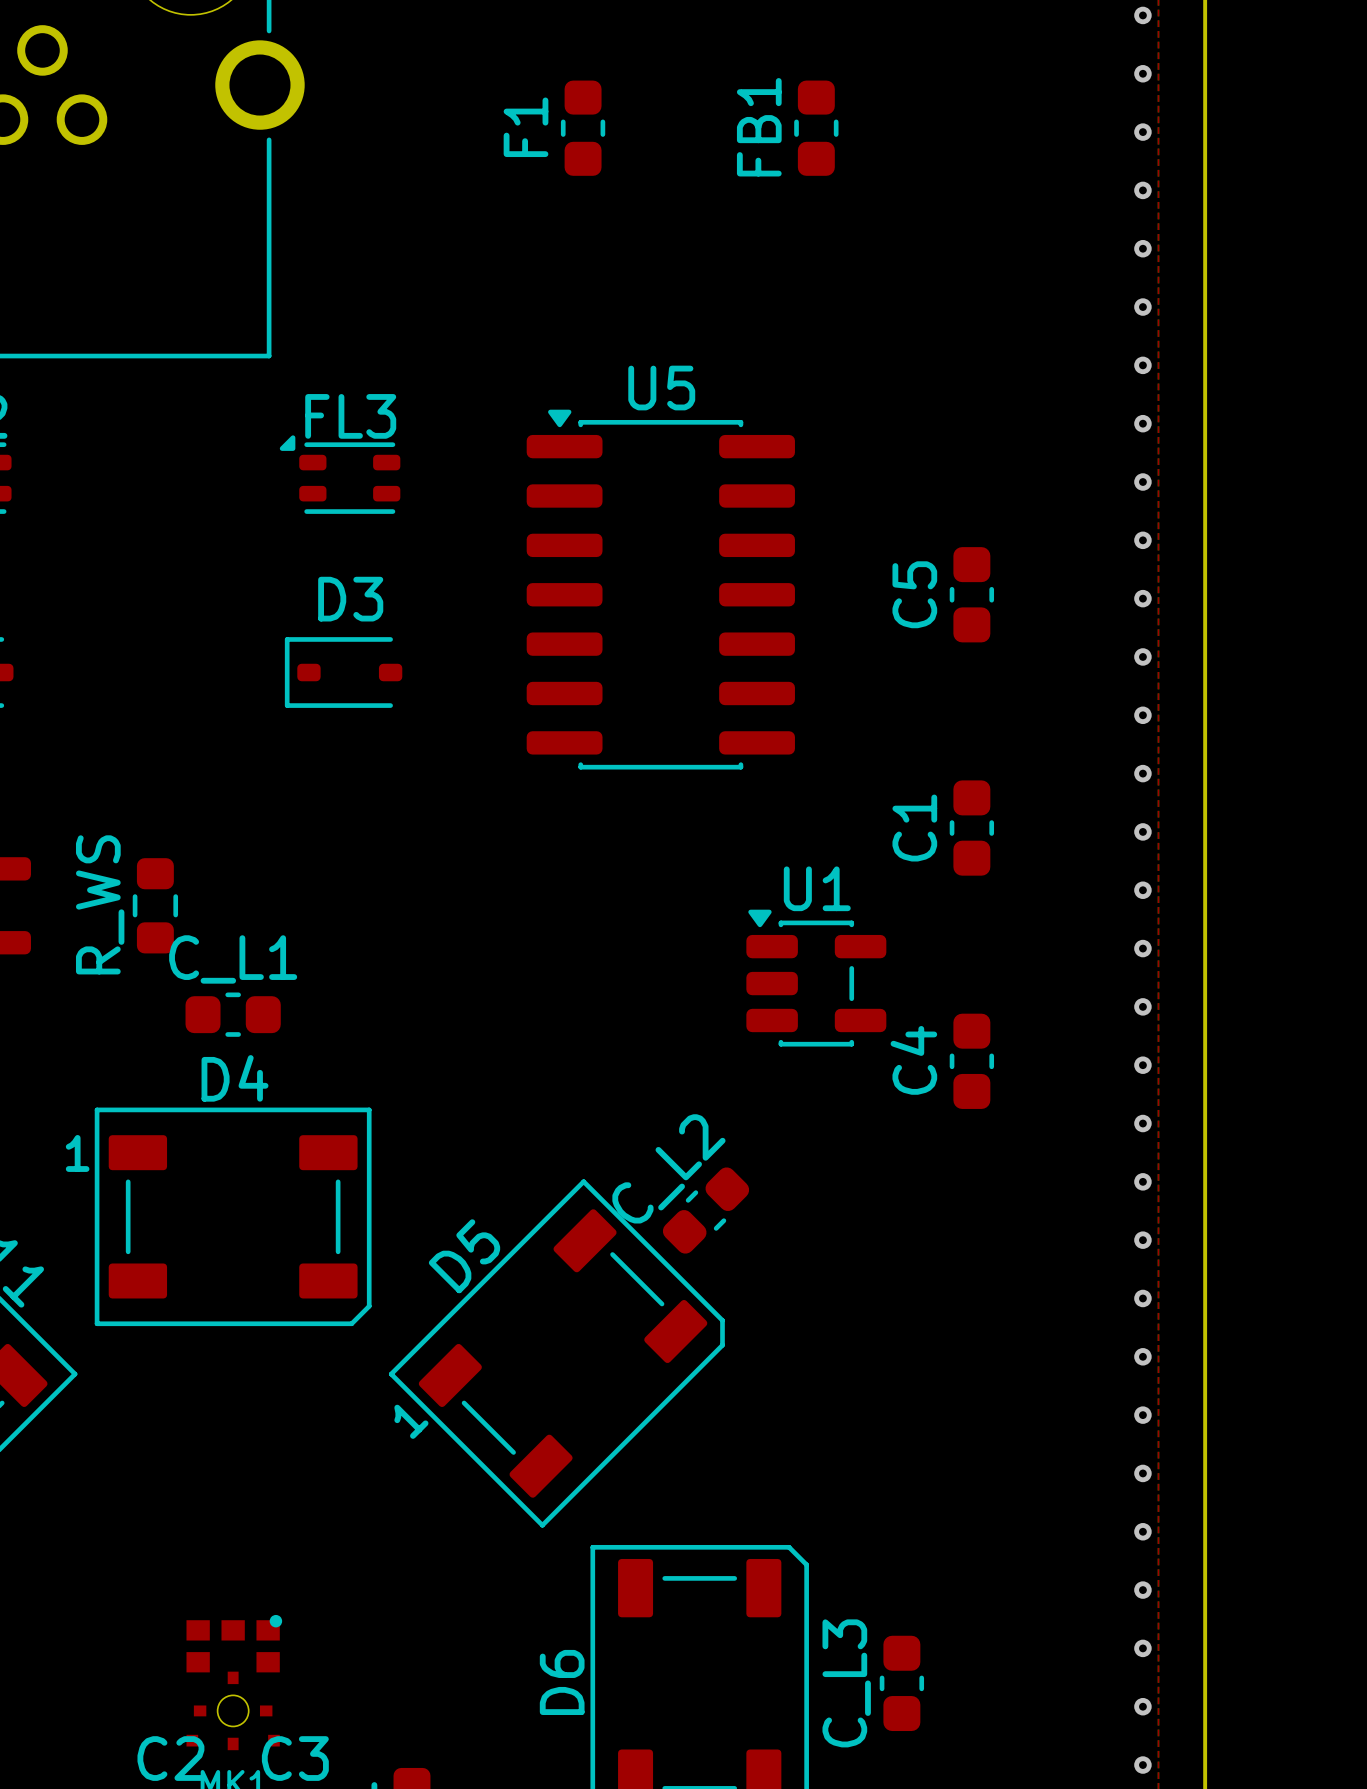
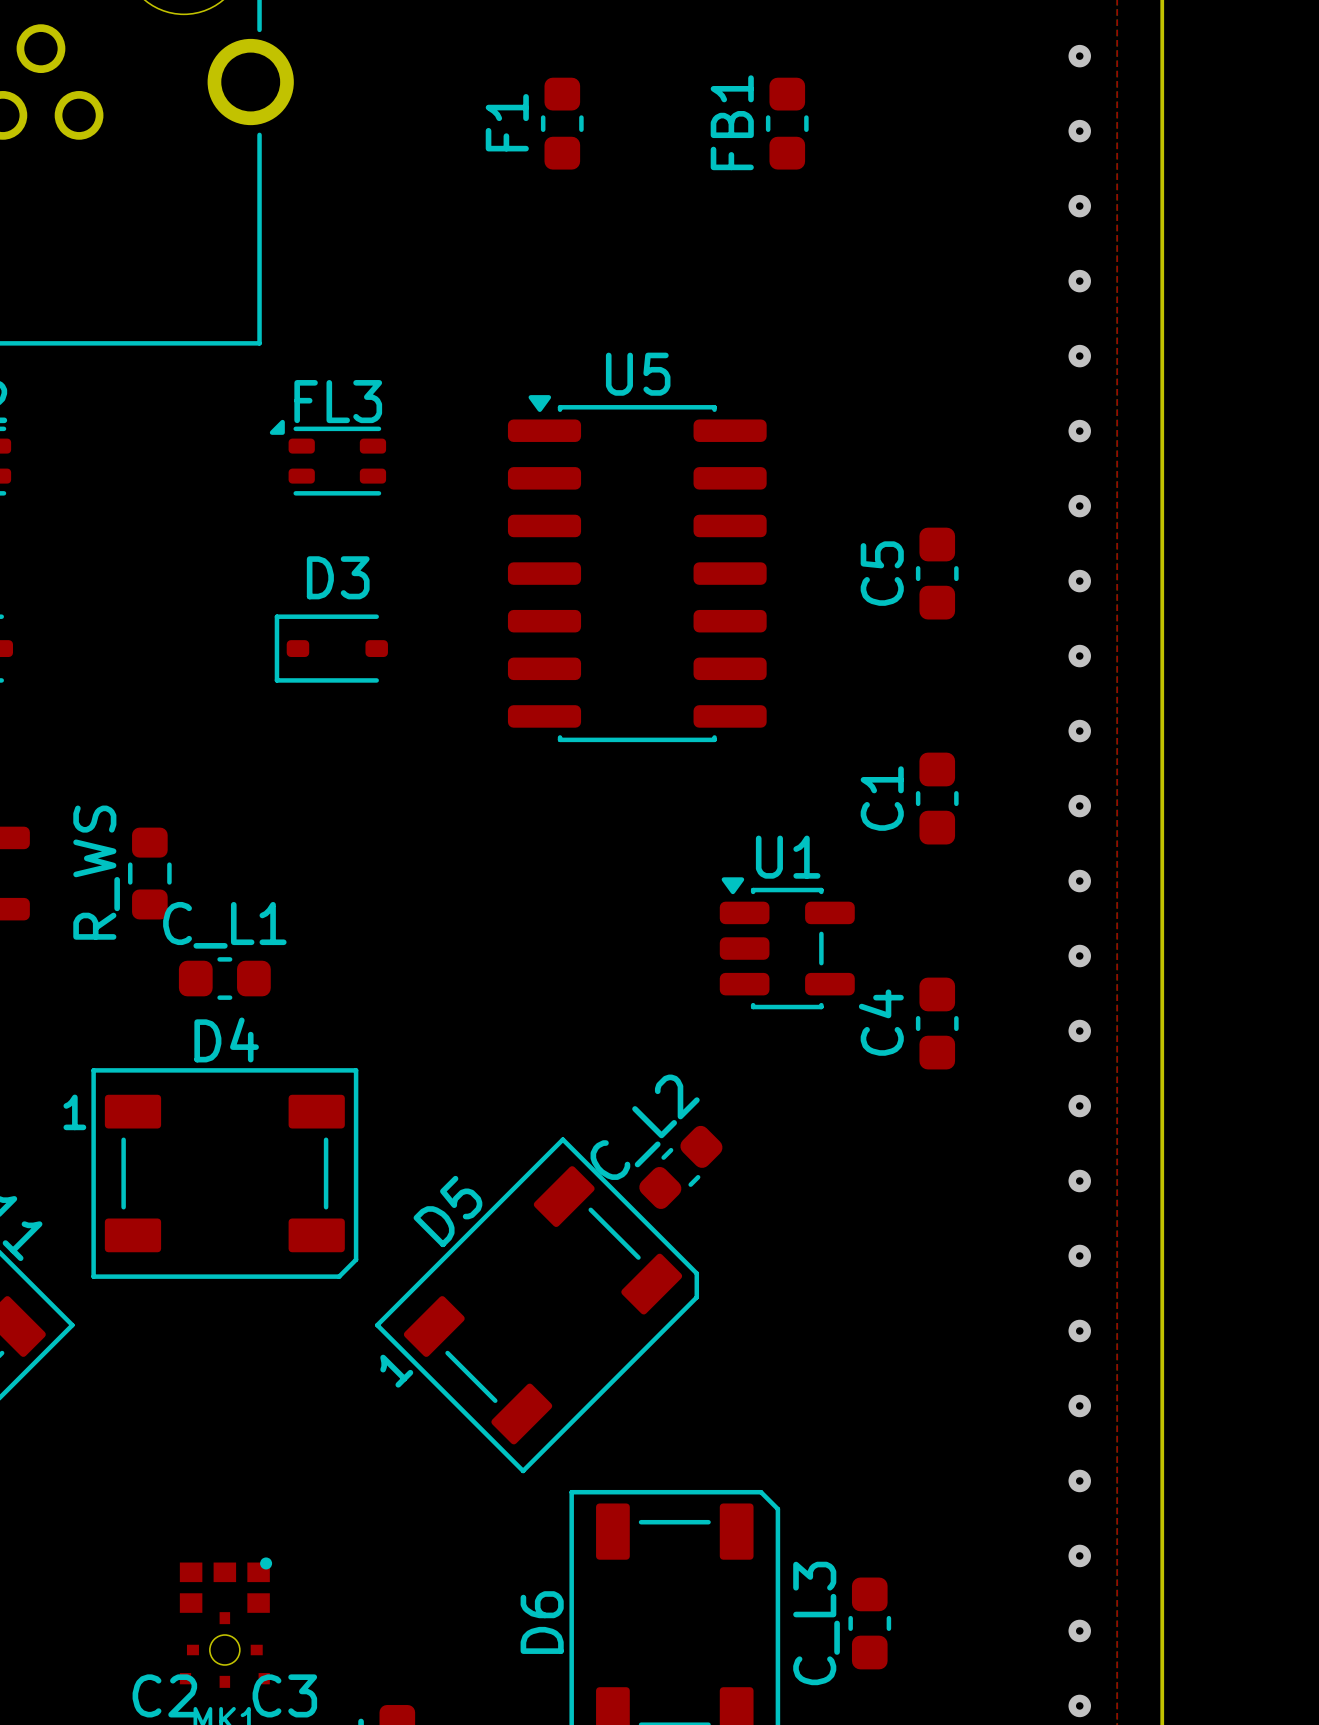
via: (1142, 15) -> none
via: none -> (1079, 56)
via: (1142, 73) -> none
via: (1142, 132) -> none
via: none -> (1079, 131)
via: (1142, 190) -> none
via: none -> (1079, 206)
via: (1142, 248) -> none
via: none -> (1079, 281)
via: (1142, 307) -> none
via: (1142, 365) -> none
via: none -> (1079, 356)
via: (1142, 423) -> none
via: none -> (1079, 431)
via: (1142, 482) -> none
via: none -> (1079, 506)
via: (1142, 540) -> none
via: (1142, 598) -> none
via: none -> (1079, 581)
via: (1142, 656) -> none
via: none -> (1079, 656)
via: (1142, 715) -> none
via: none -> (1079, 731)
via: (1142, 773) -> none
via: (1142, 831) -> none
via: none -> (1079, 806)
via: (1142, 890) -> none
via: none -> (1079, 881)
via: (1142, 948) -> none
via: none -> (1079, 956)
via: (1142, 1006) -> none
via: (1142, 1065) -> none
via: none -> (1079, 1031)
via: (1142, 1123) -> none
via: none -> (1079, 1106)
via: (1142, 1181) -> none
via: none -> (1079, 1181)
via: (1142, 1240) -> none
via: (1142, 1298) -> none
via: none -> (1079, 1256)
via: (1142, 1356) -> none
via: none -> (1079, 1330)
via: (1142, 1415) -> none
via: none -> (1079, 1405)
via: (1142, 1473) -> none
via: (1142, 1531) -> none
via: none -> (1079, 1480)
via: (1142, 1590) -> none
via: none -> (1079, 1555)
via: (1142, 1648) -> none
via: none -> (1079, 1630)
via: (1142, 1706) -> none
via: (1142, 1765) -> none
via: none -> (1079, 1705)

